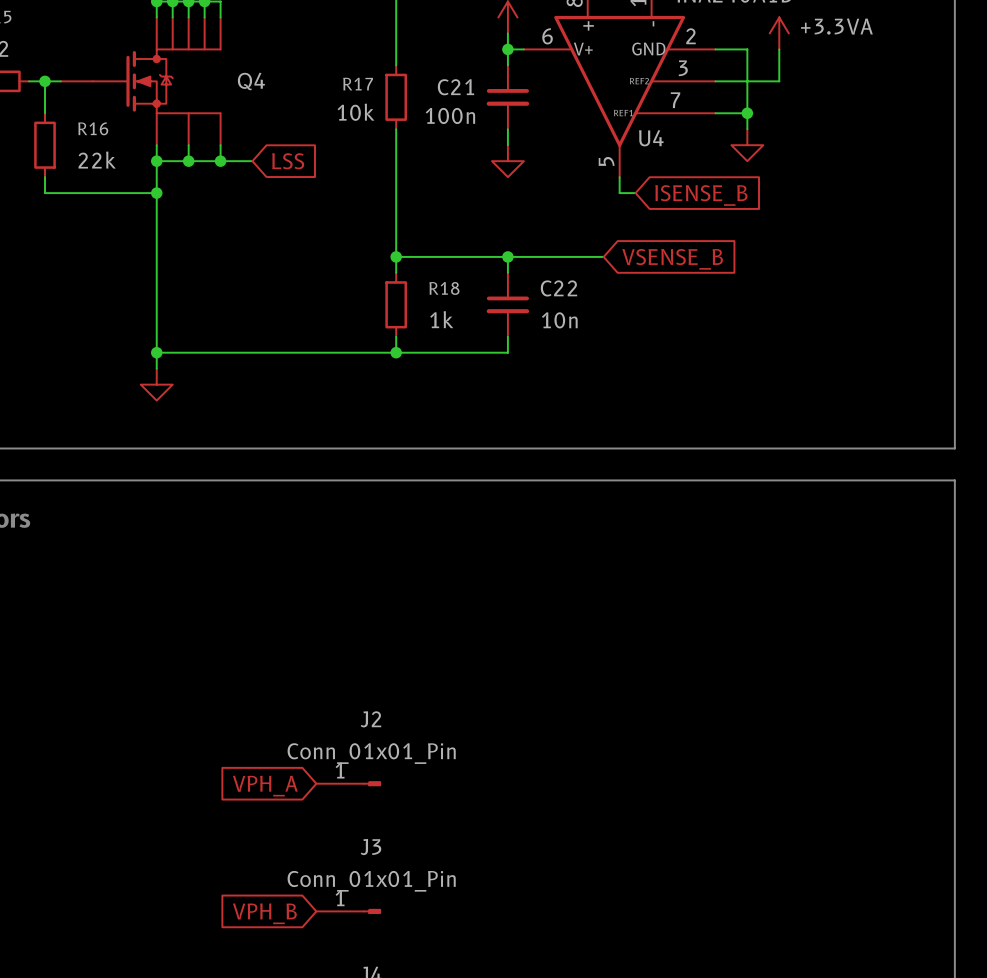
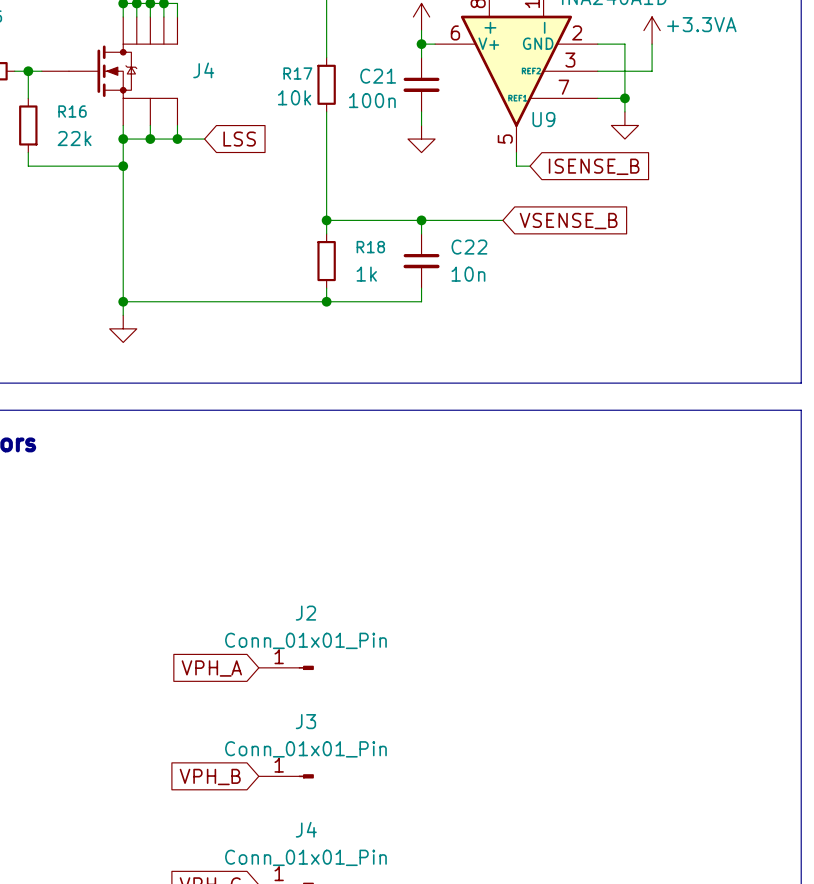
Q4 name: Q4 (251, 81) -> J4 (203, 70)
U4 name: U4 (651, 138) -> U9 (543, 119)

